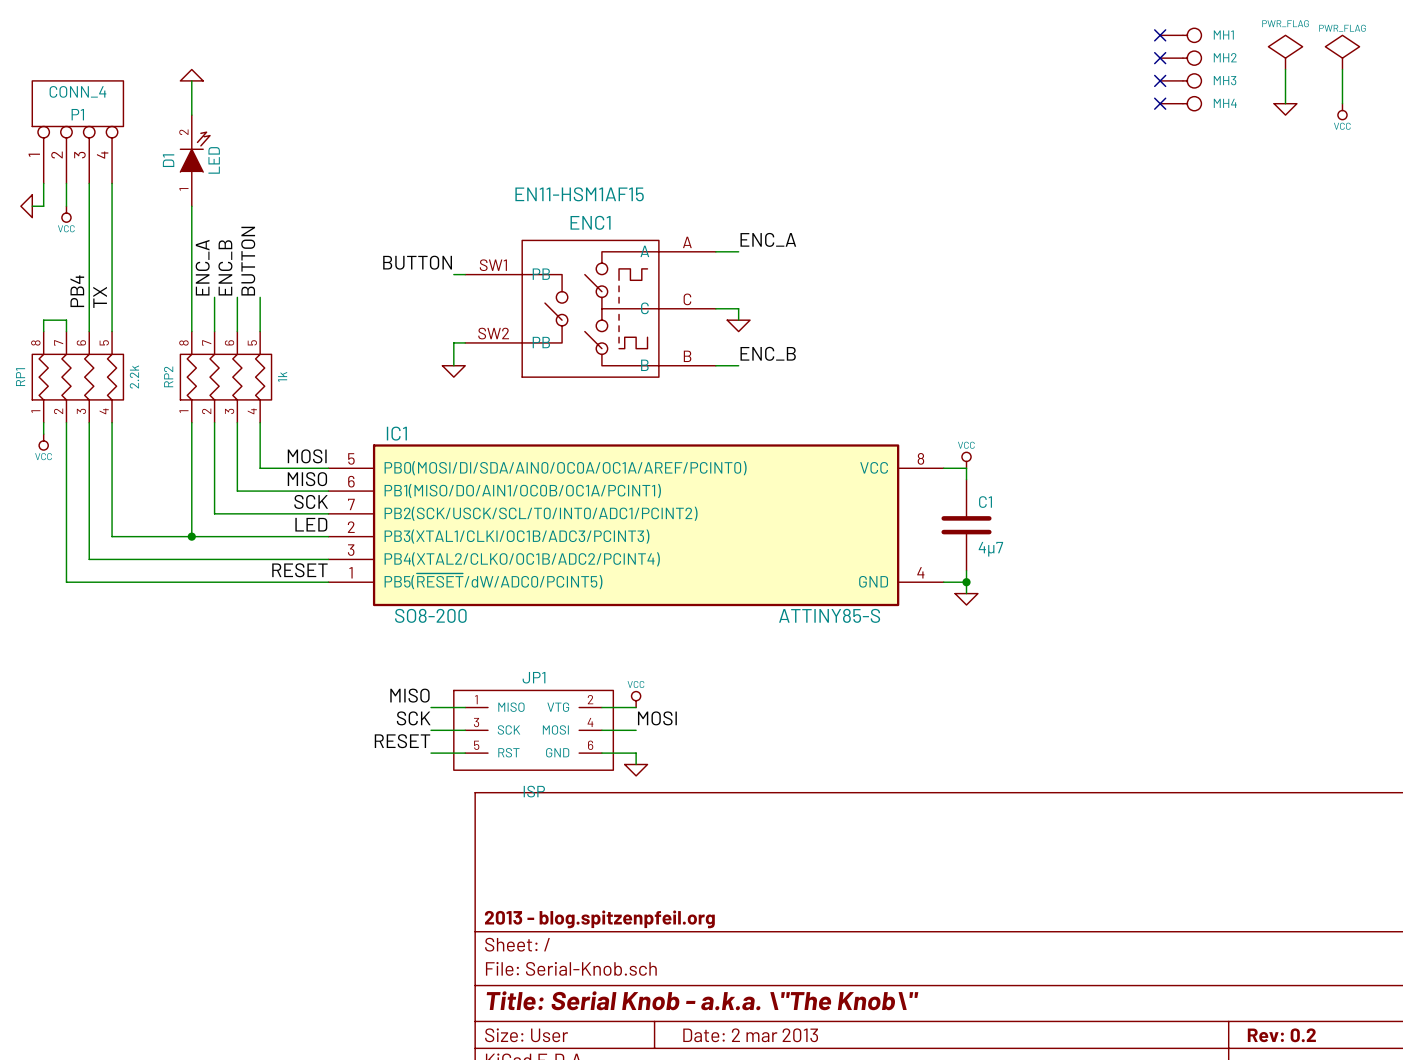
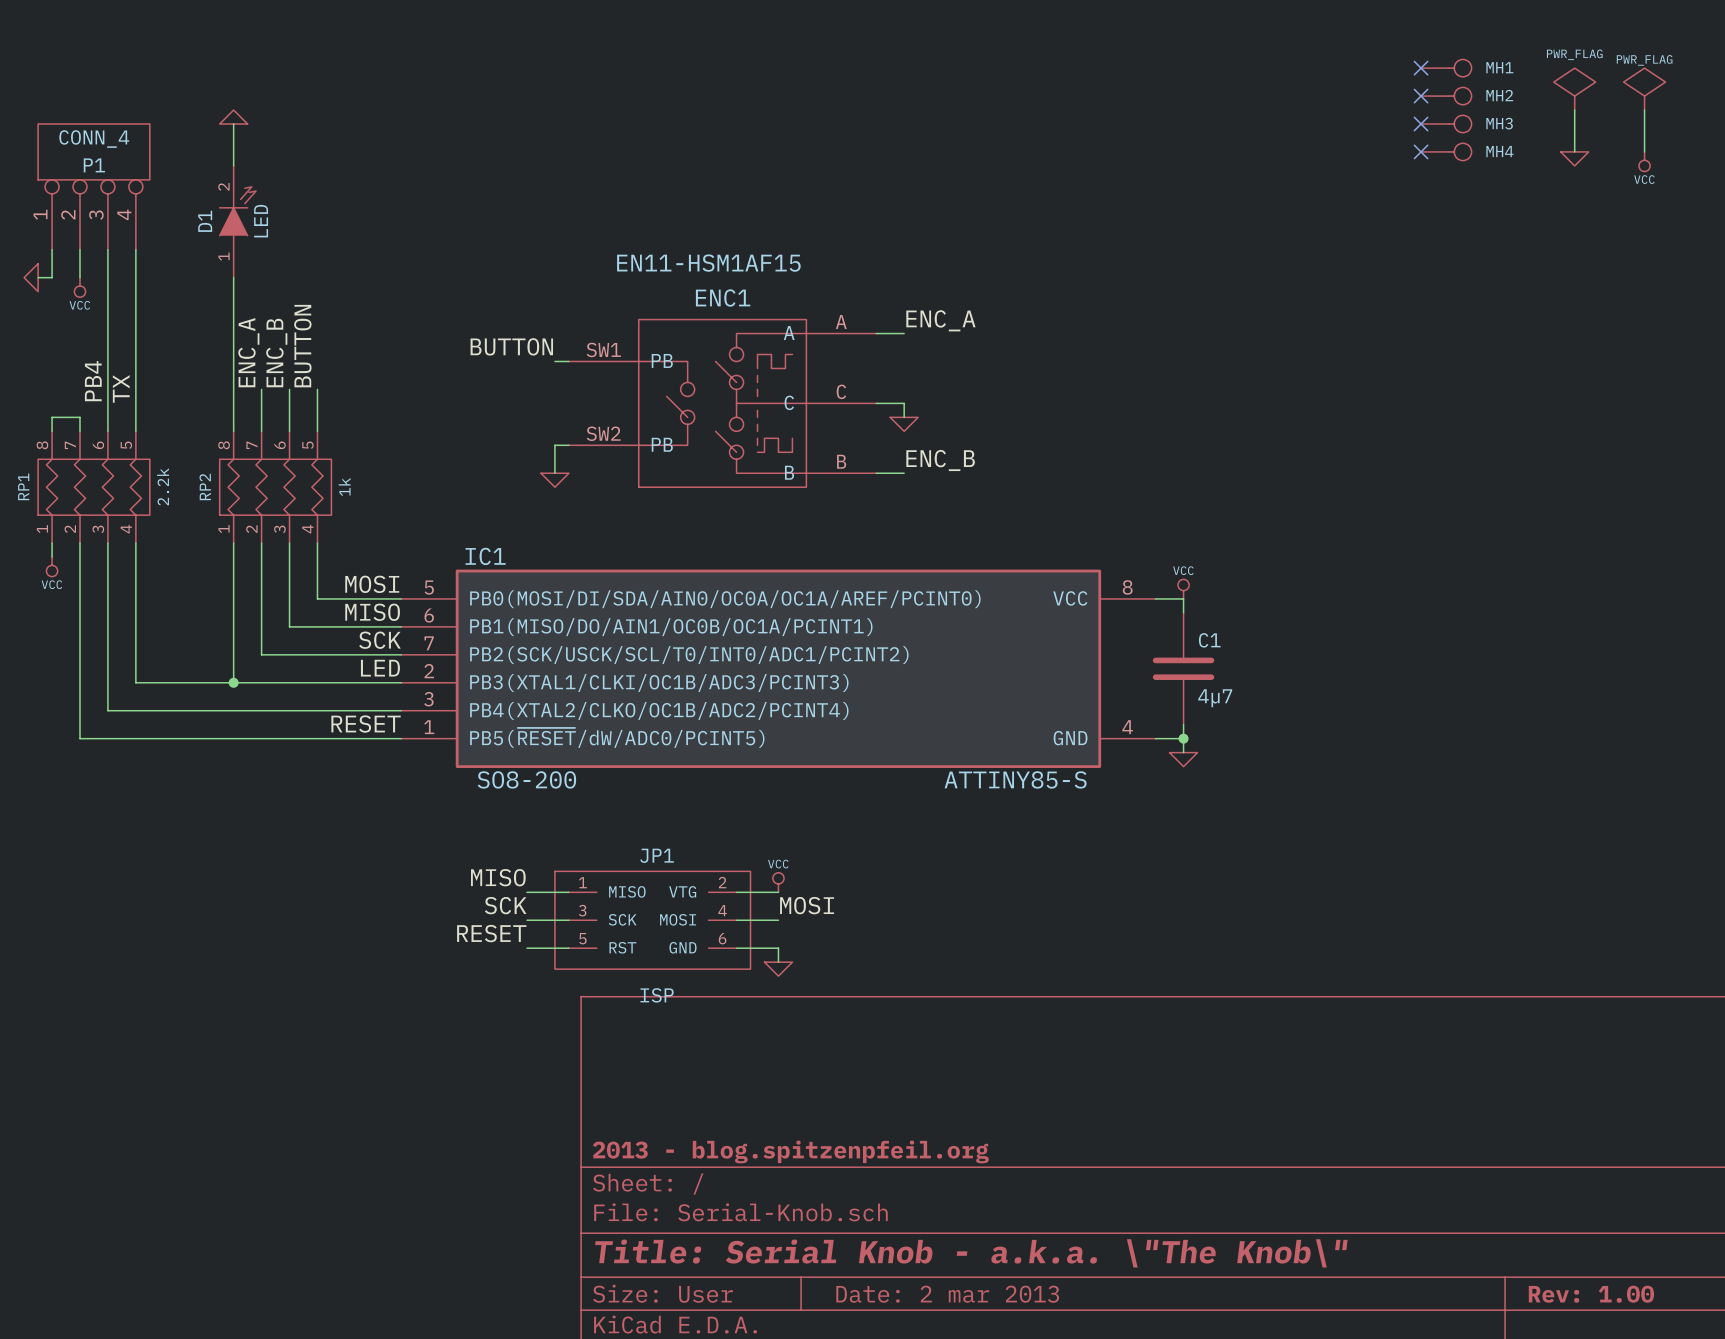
title block: Rev: 0.2 (1281, 1035) -> Rev: 1.00 (1591, 1294)

